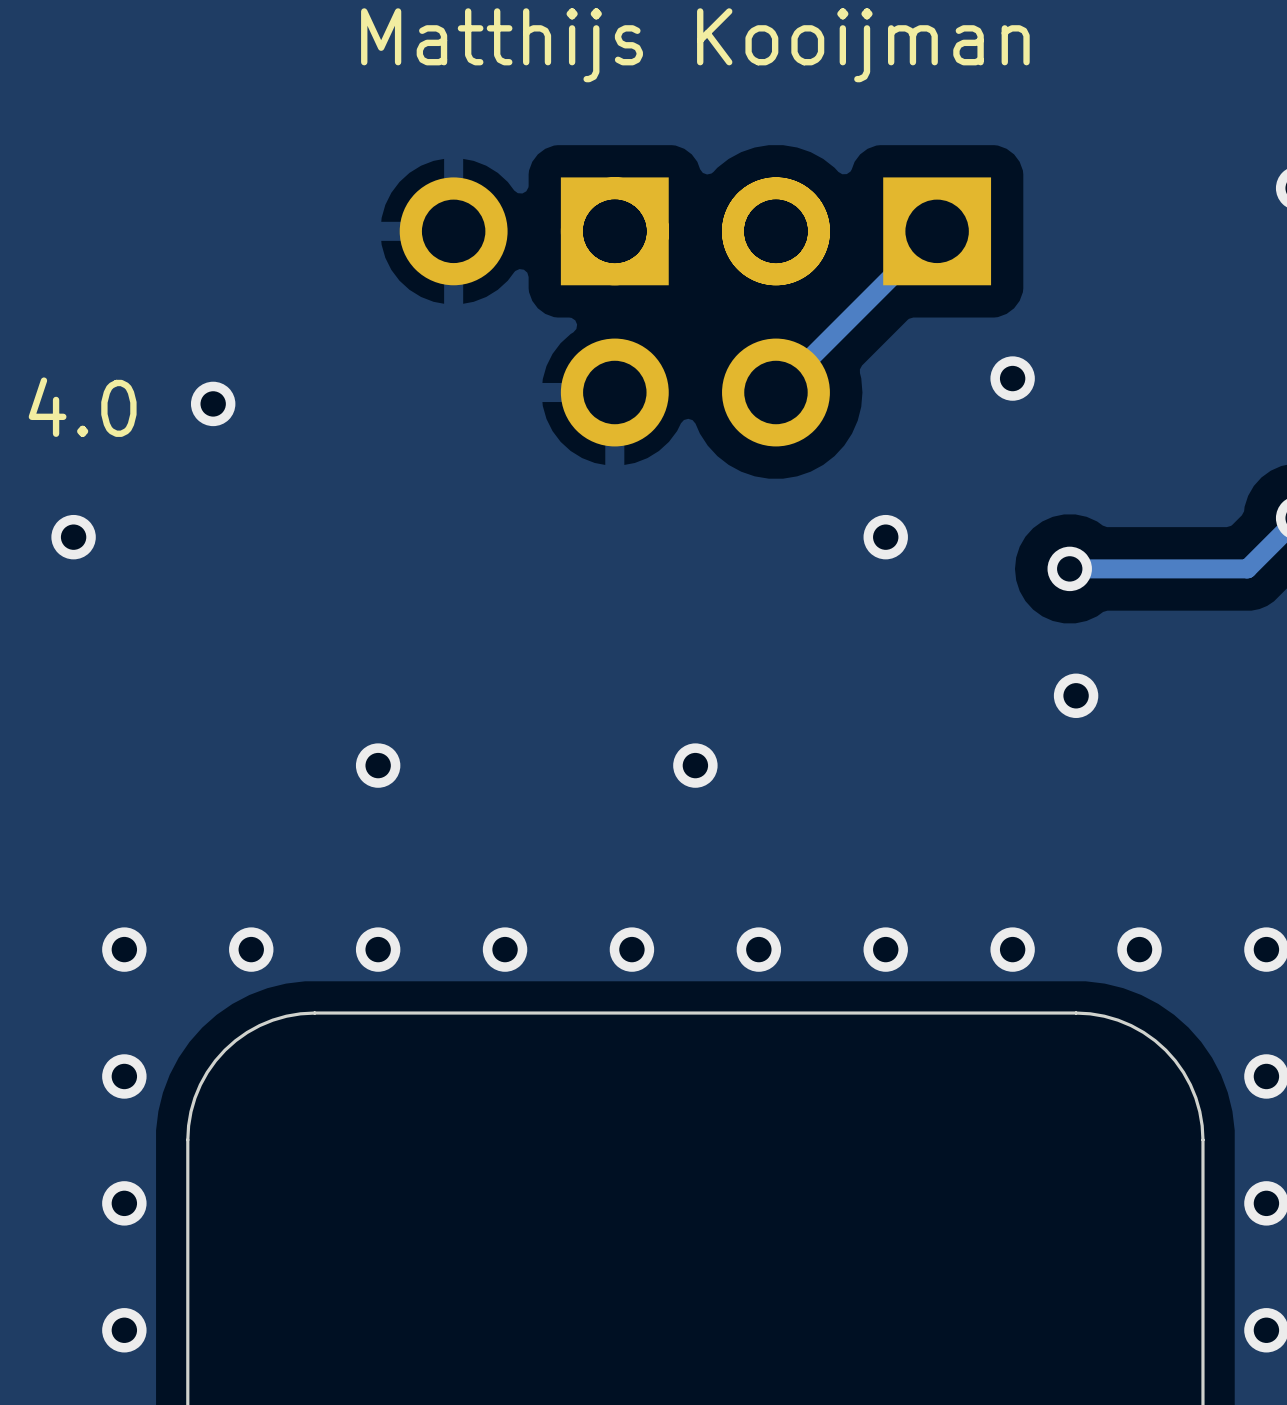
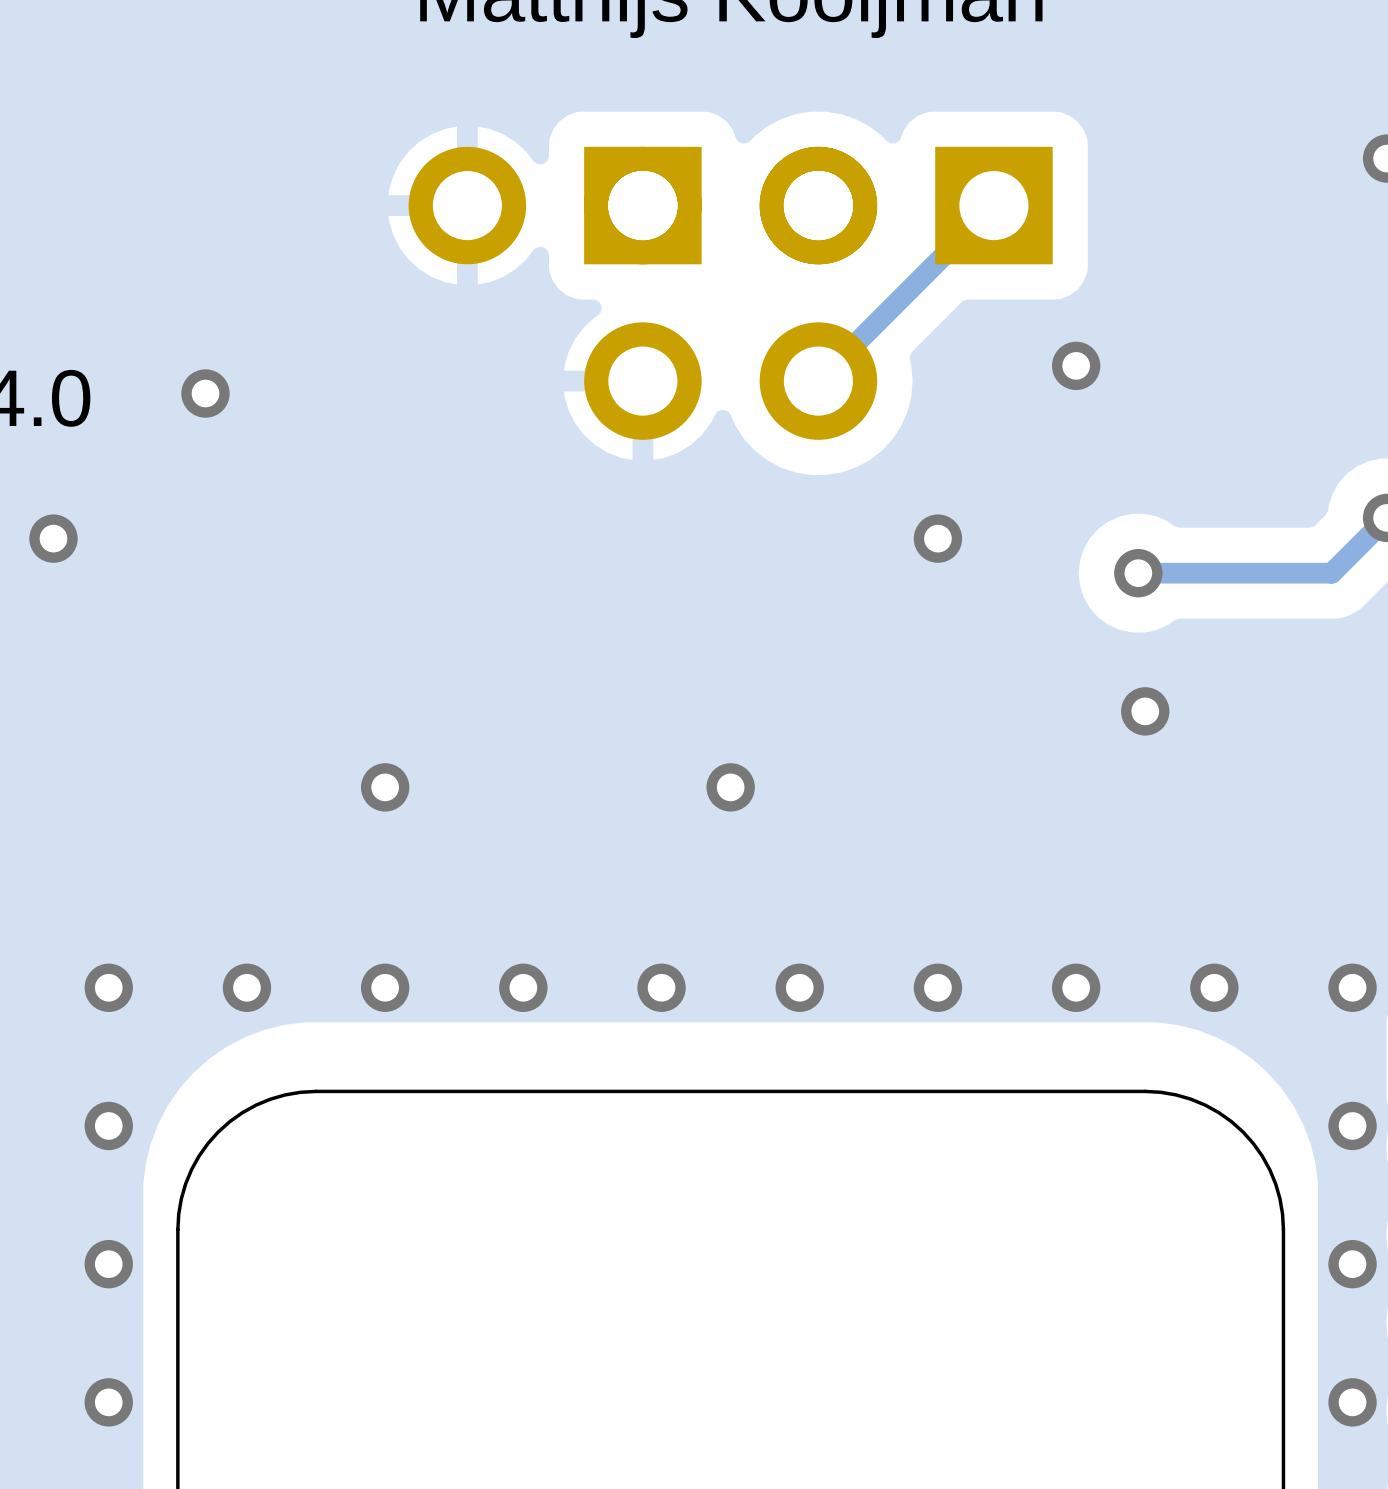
board edge: (1202, 1171) (1202, 1139) (1199, 1111) (1190, 1084) (1175, 1060) (1155, 1040) (1131, 1025) (1104, 1016) (1076, 1013) (314, 1013) (286, 1016) (259, 1025) (235, 1040) (215, 1060) (207, 1072) (194, 1098) (190, 1111) (187, 1139) (187, 1171) -> (1283, 1229) (1279, 1198) (1269, 1169) (1253, 1143) (1242, 1131) (1218, 1112) (1190, 1099) (1160, 1092) (1145, 1091) (300, 1092) (270, 1099) (242, 1112) (218, 1131) (208, 1143) (199, 1156) (185, 1183) (178, 1214) (177, 1229)

